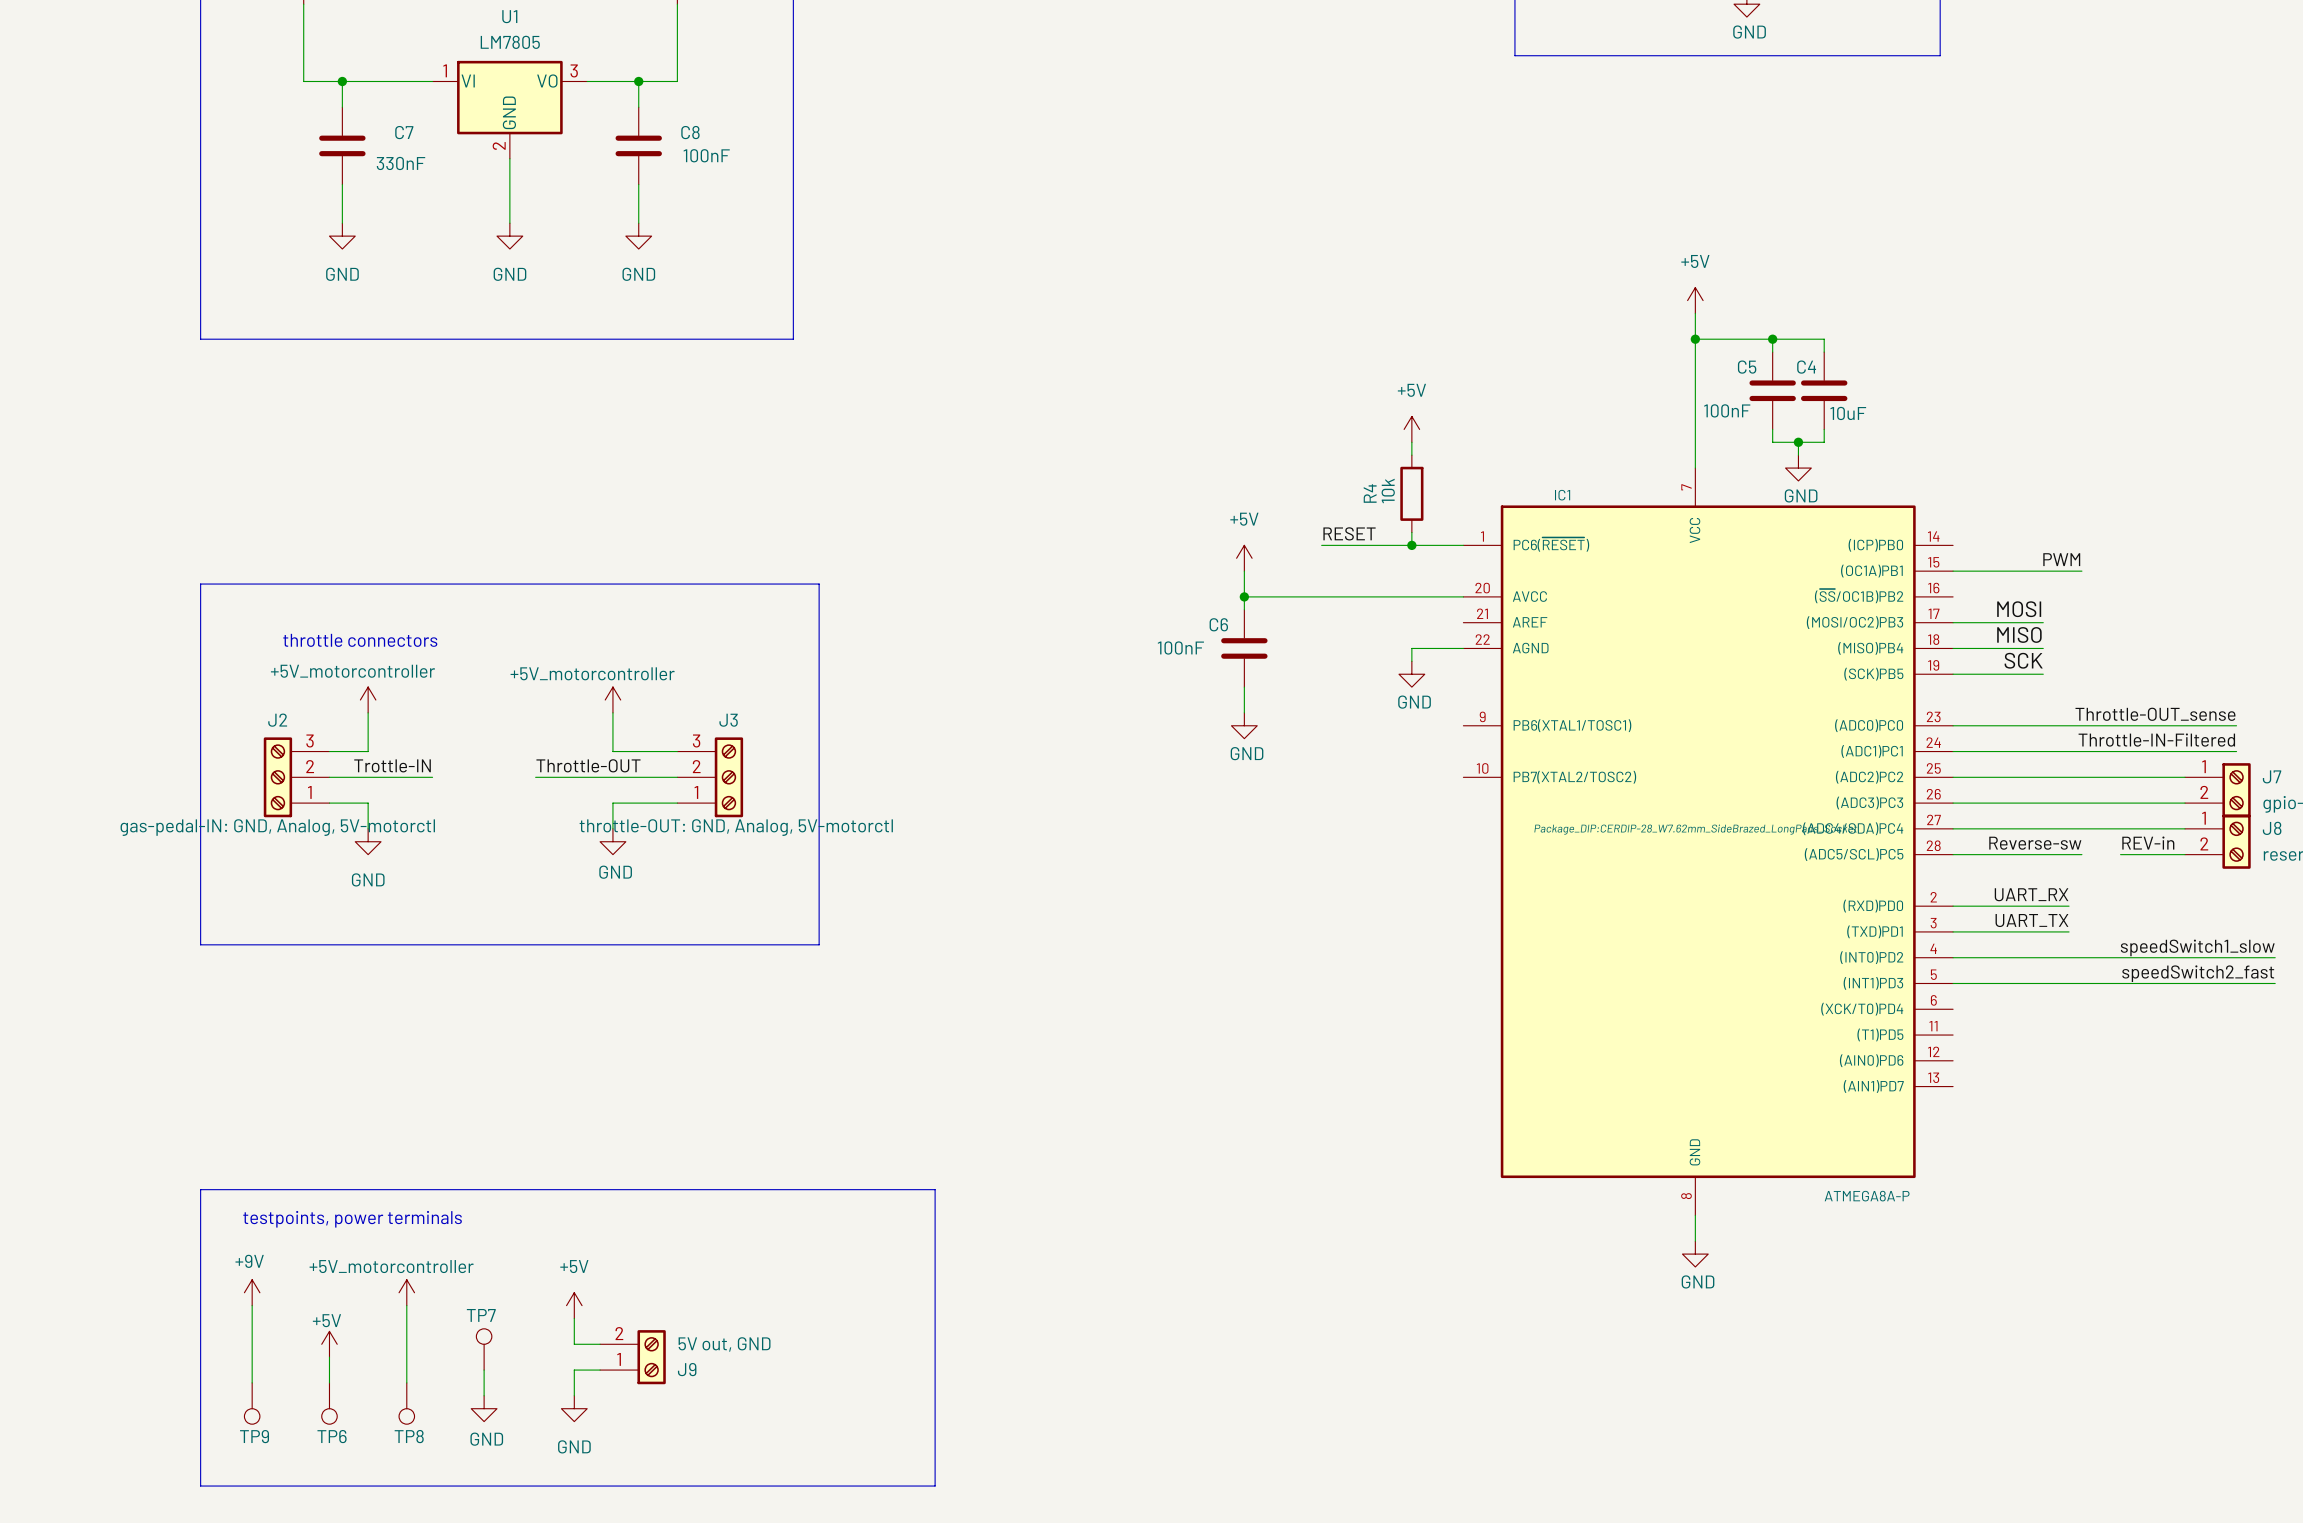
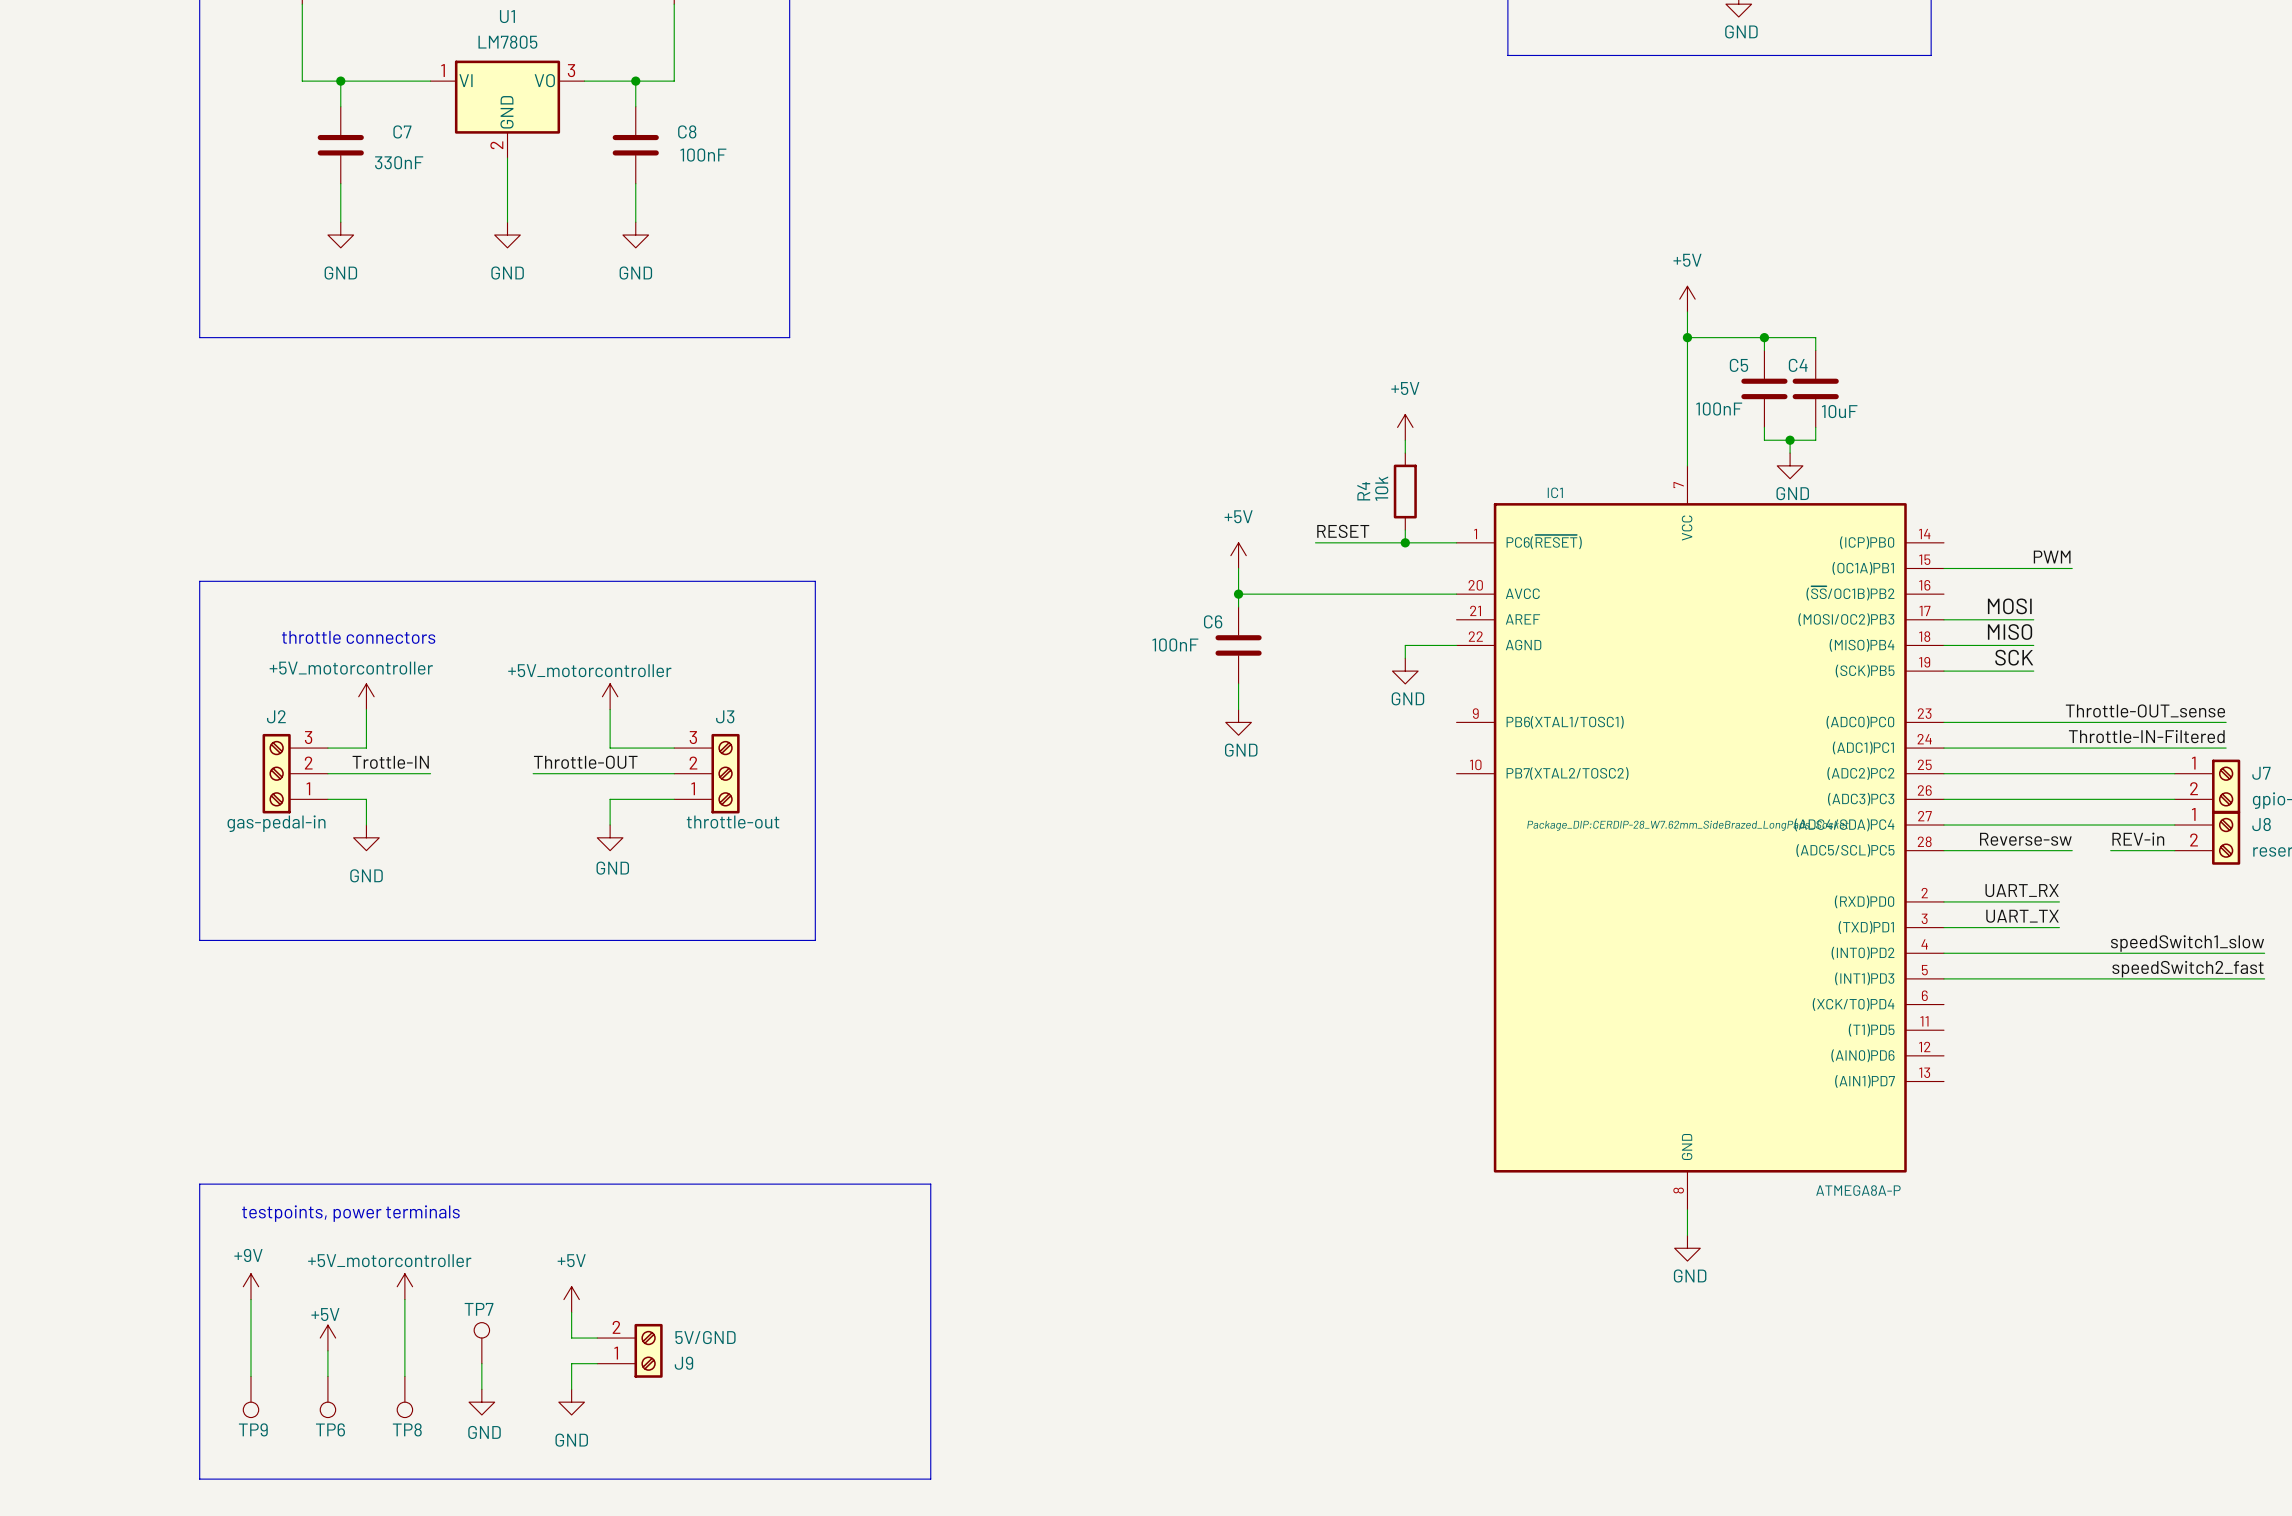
J2 value: gas-pedal-IN: GND, Analog, 5V-motorctl (277, 827) -> gas-pedal-in (276, 823)
J3 value: throttle-OUT: GND, Analog, 5V-motorctl (736, 827) -> throttle-out (733, 822)
J9 value: 5V out, GND (724, 1344) -> 5V/GND (705, 1337)

